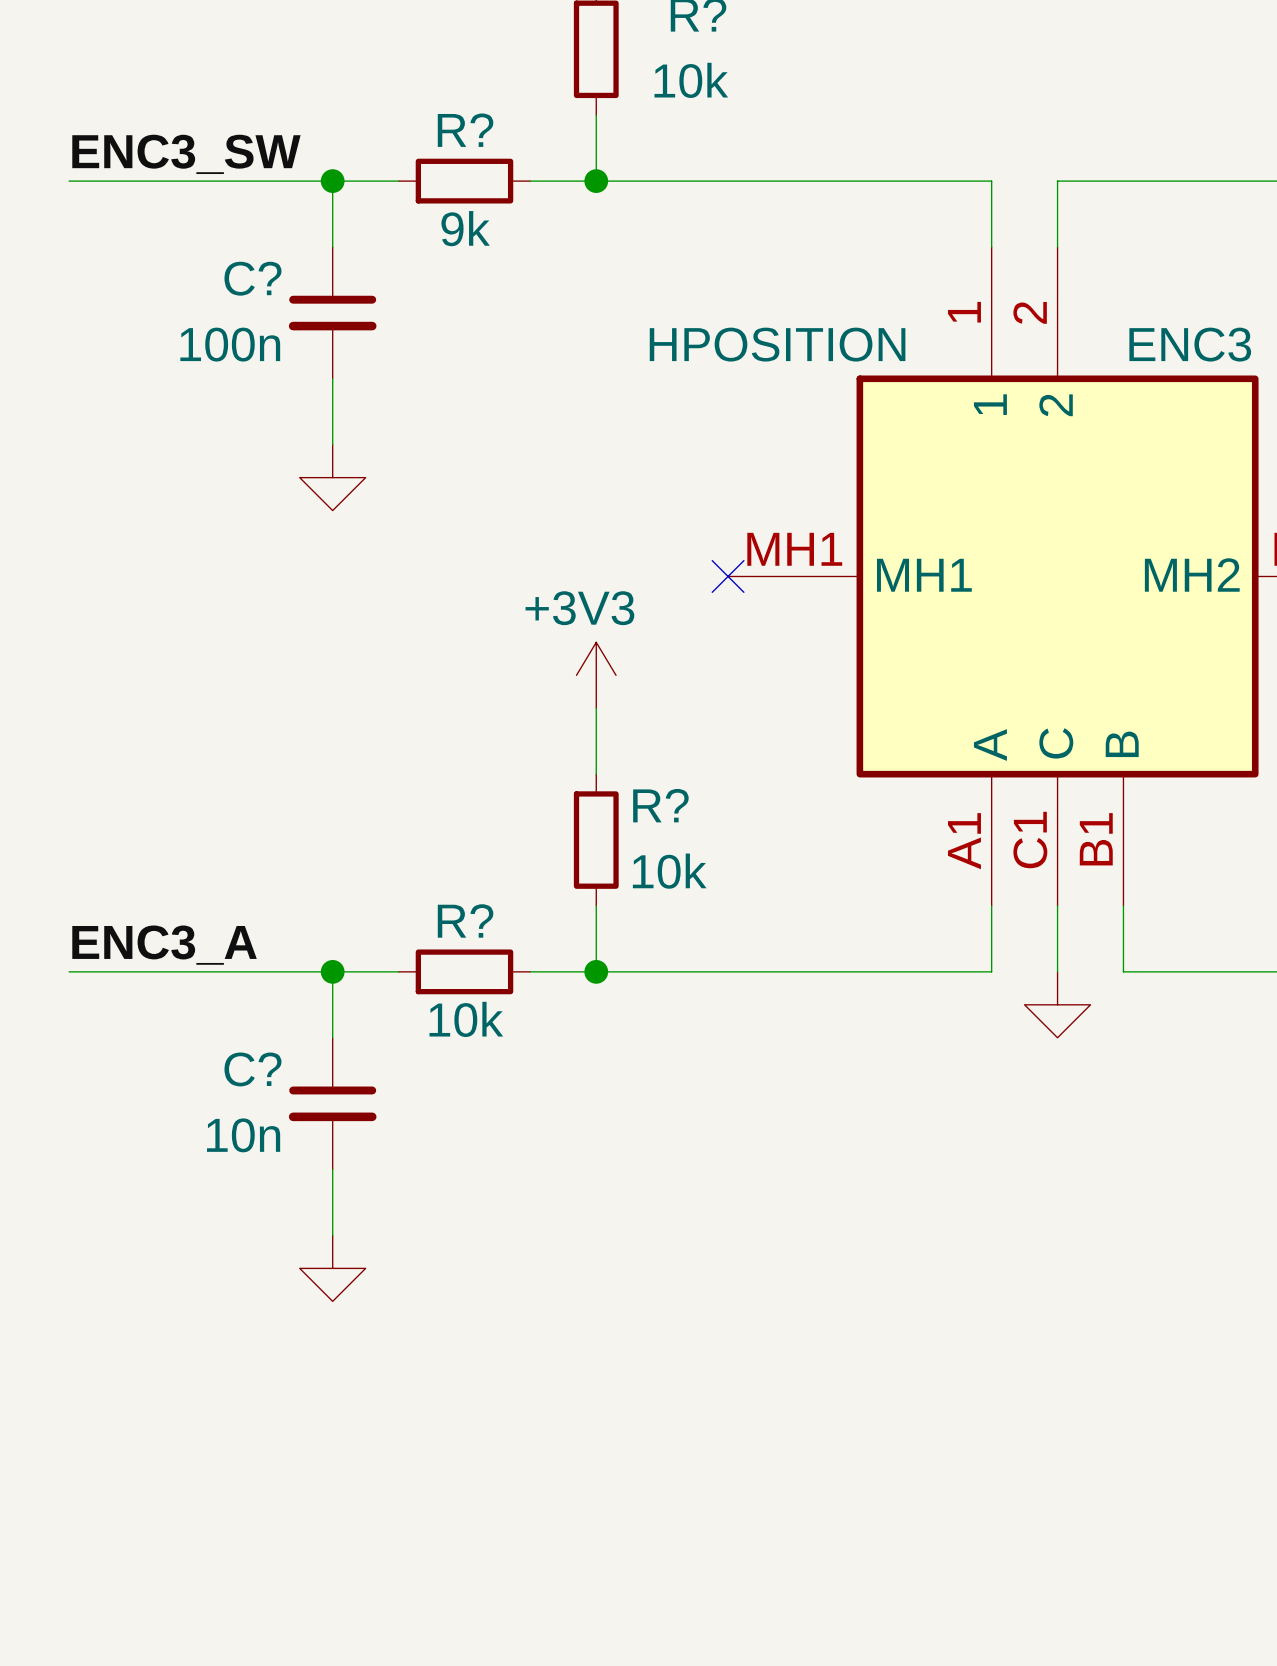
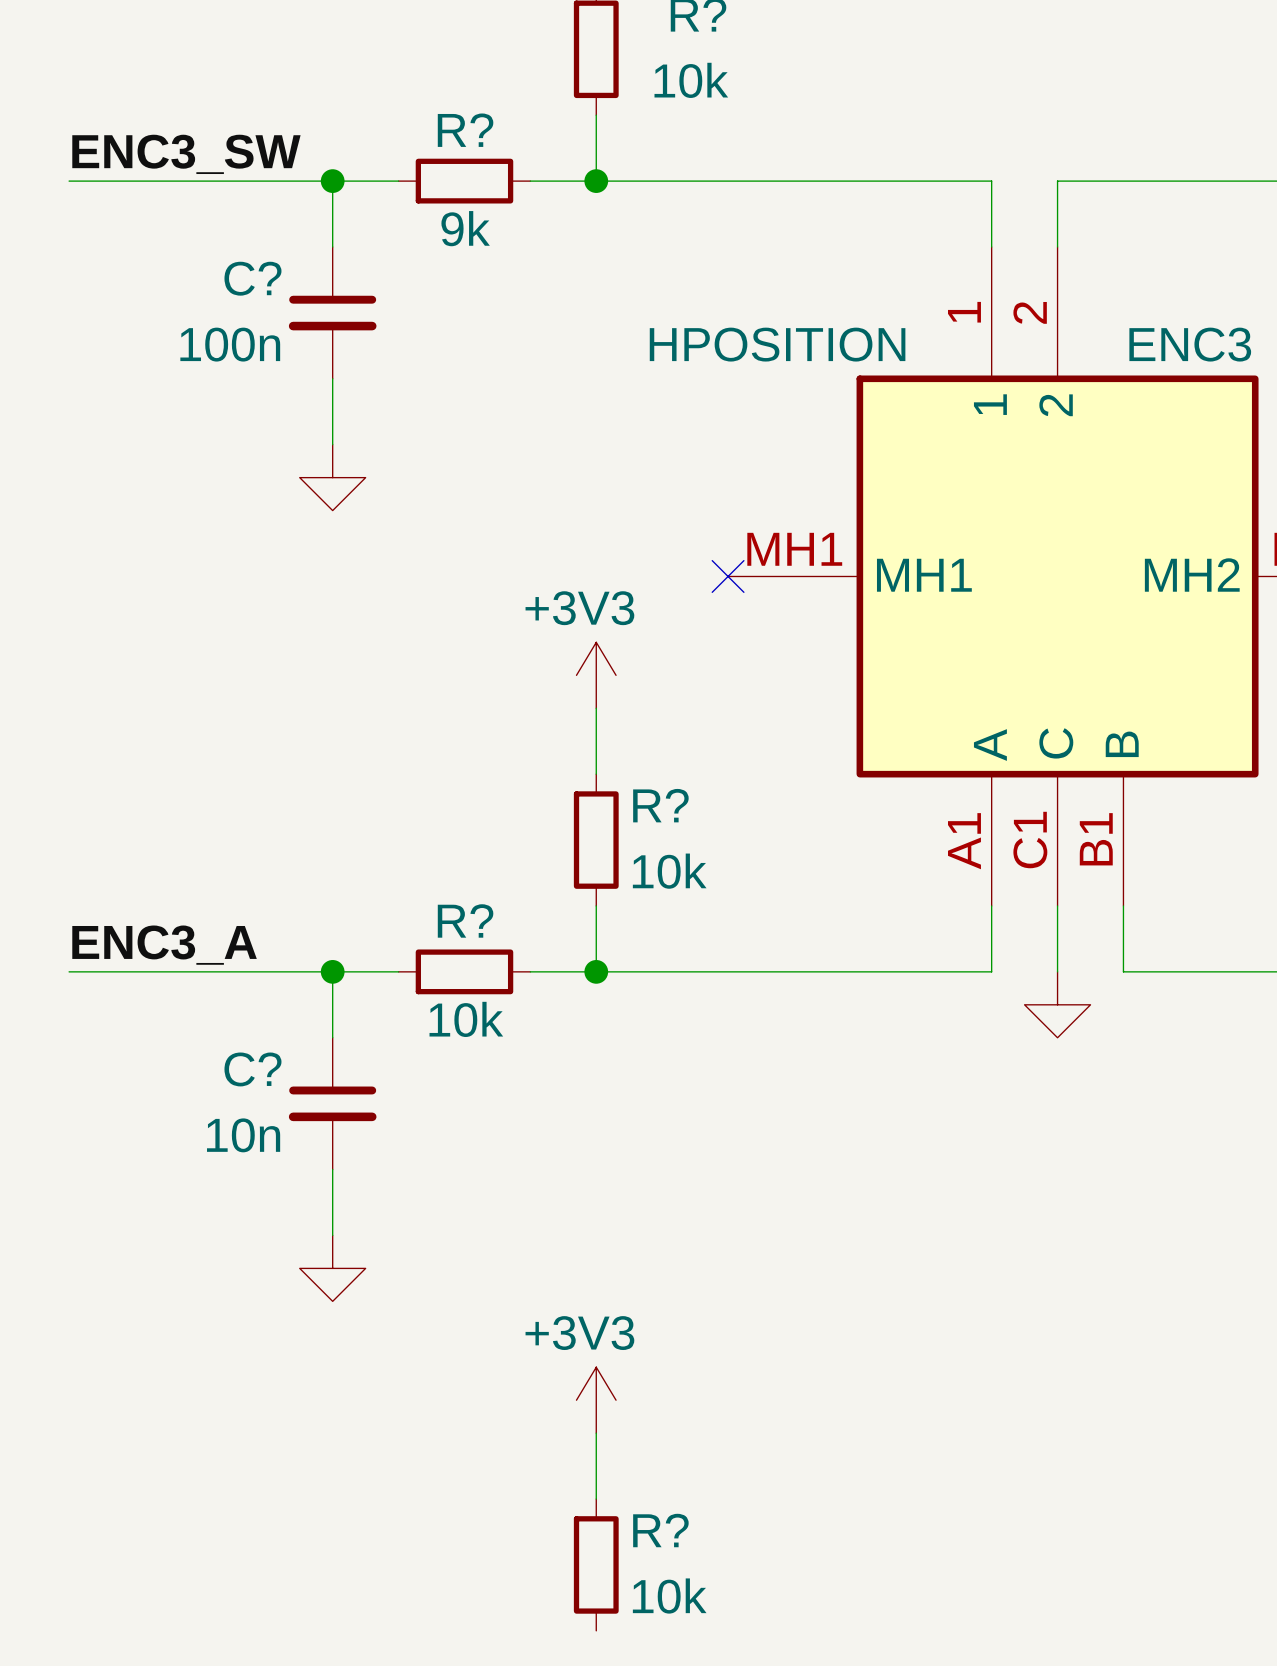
power symbol: none -> +3V3 (596, 1400)
wire: none -> (596, 1433) (596, 1499)
R?: none -> 10k (596, 1564)

